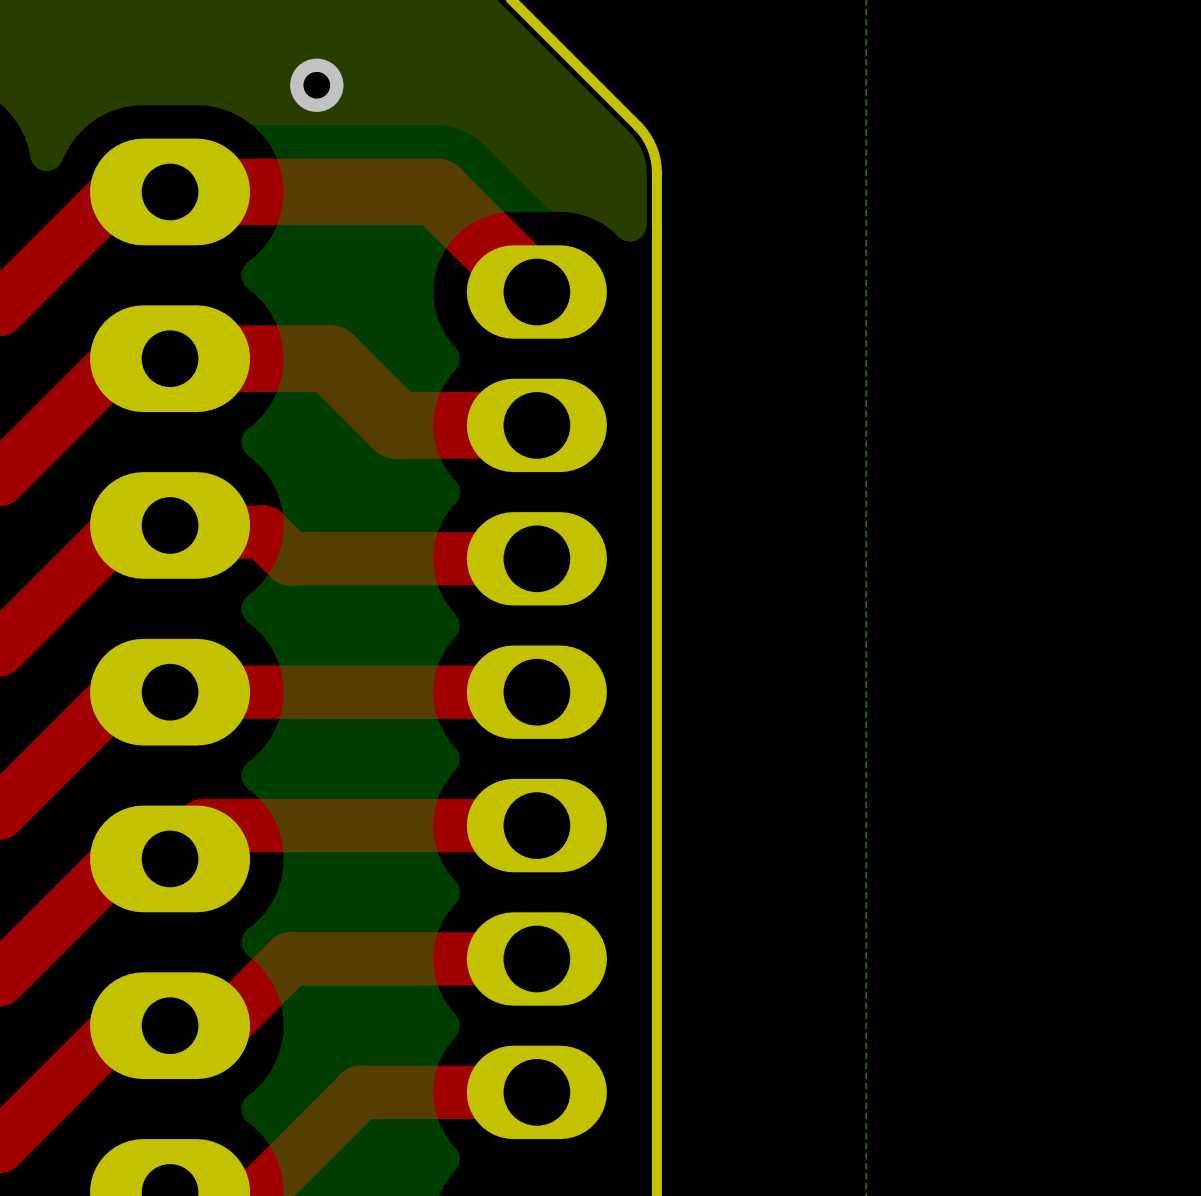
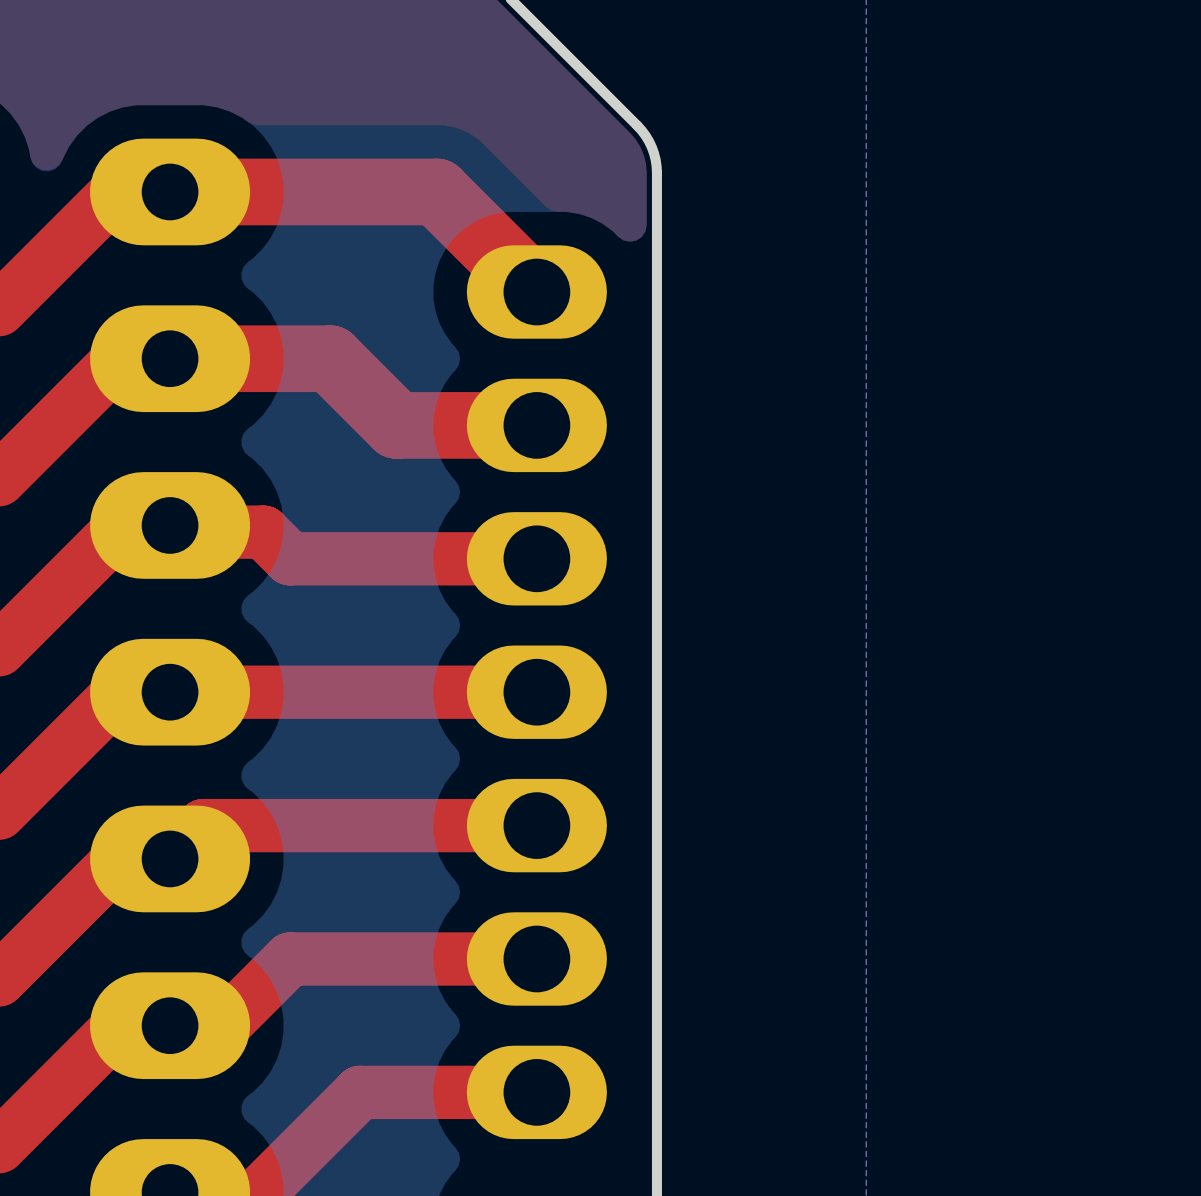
via: (316, 85) -> none

